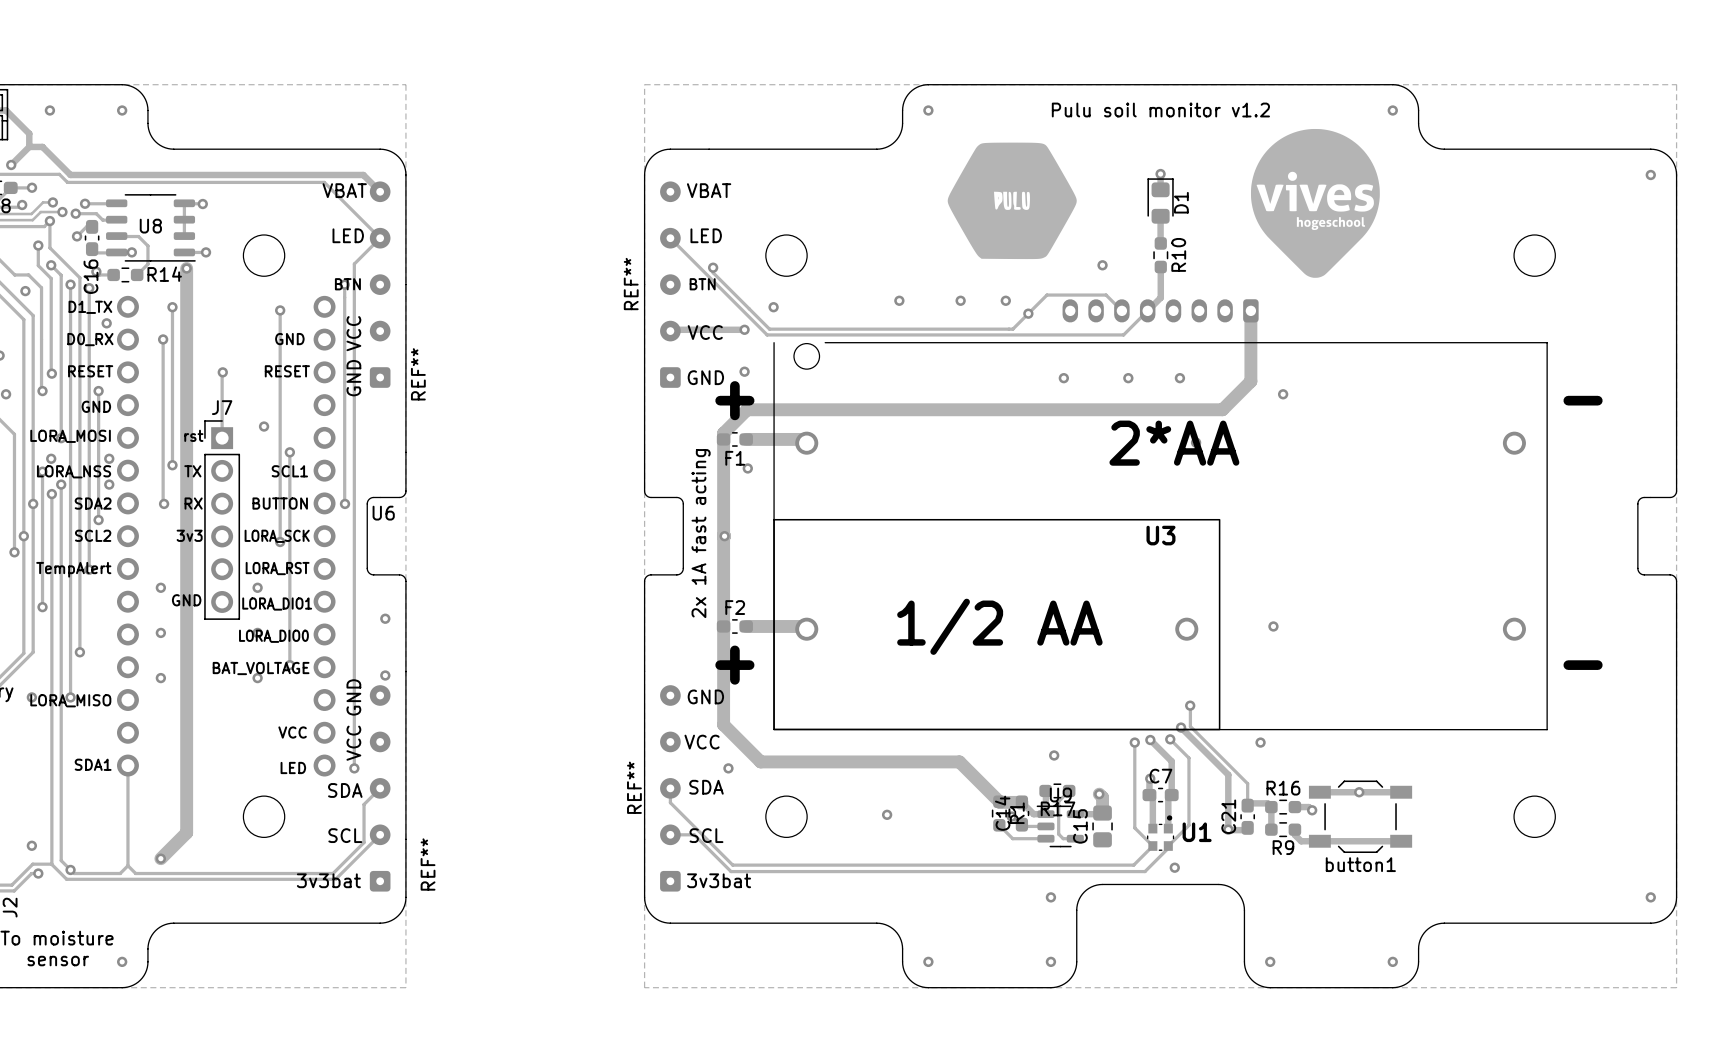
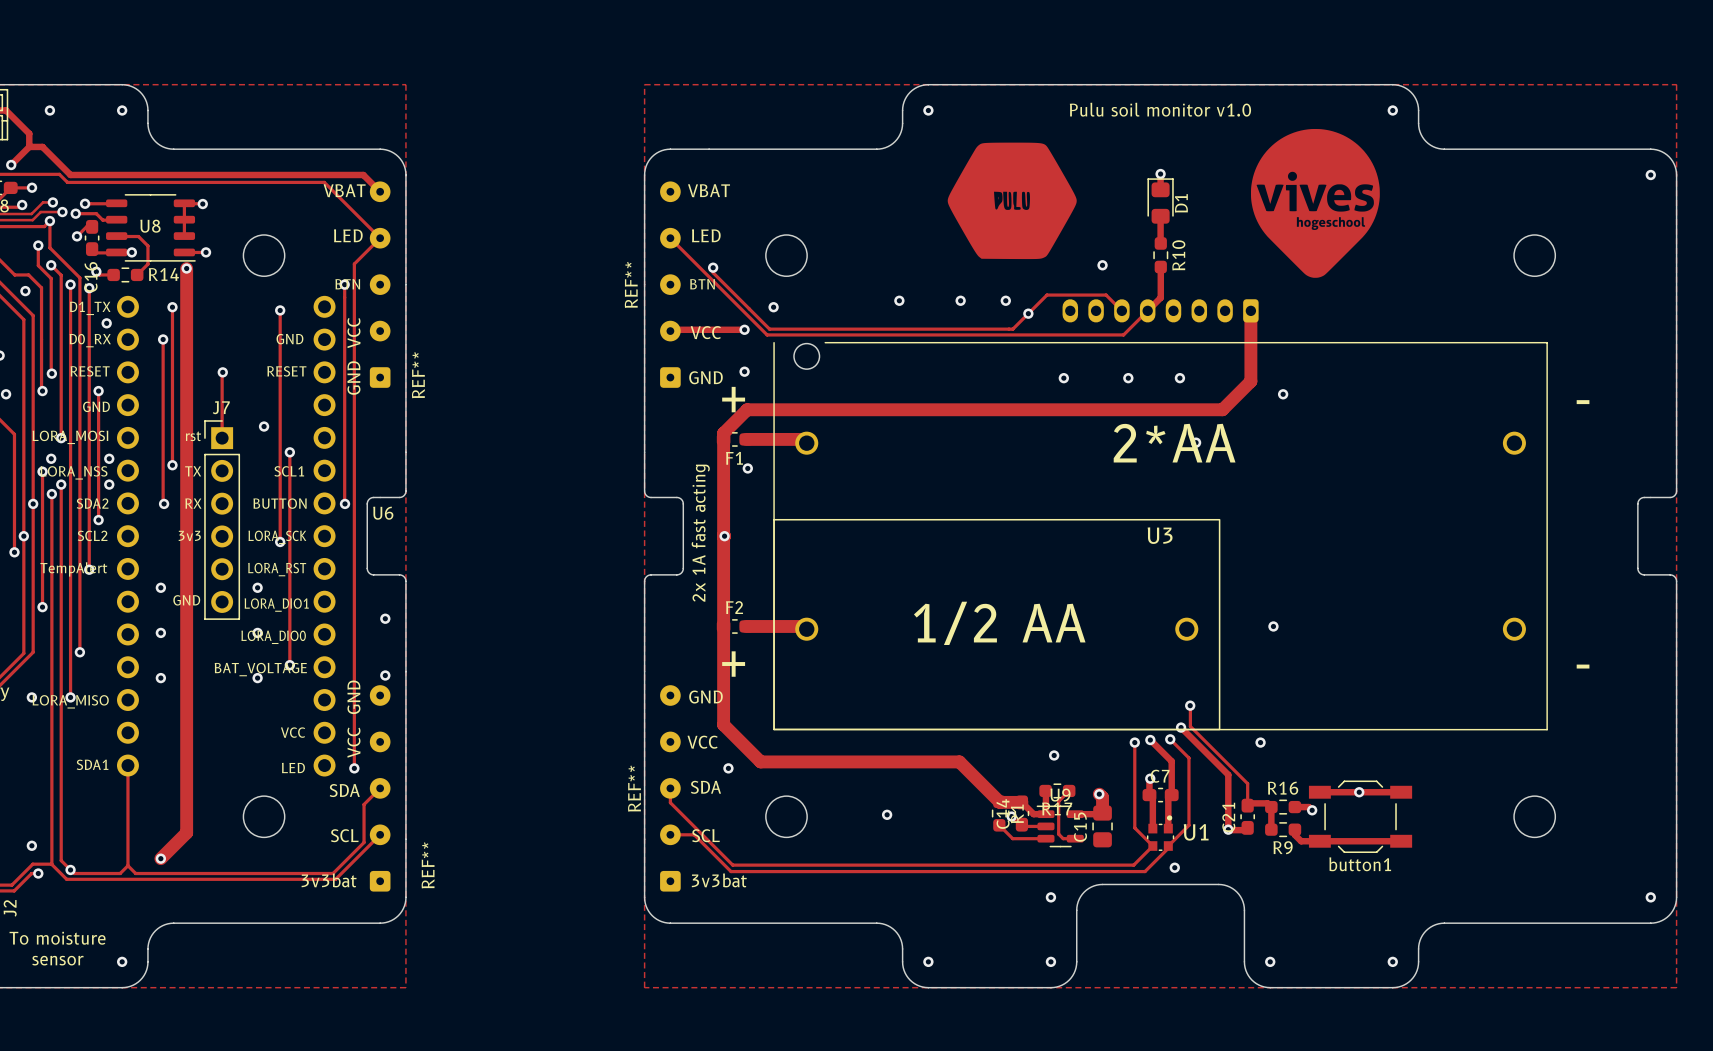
text: Pulu soil monitor v1.2 (1160, 110) -> Pulu soil monitor v1.0 (1160, 109)

